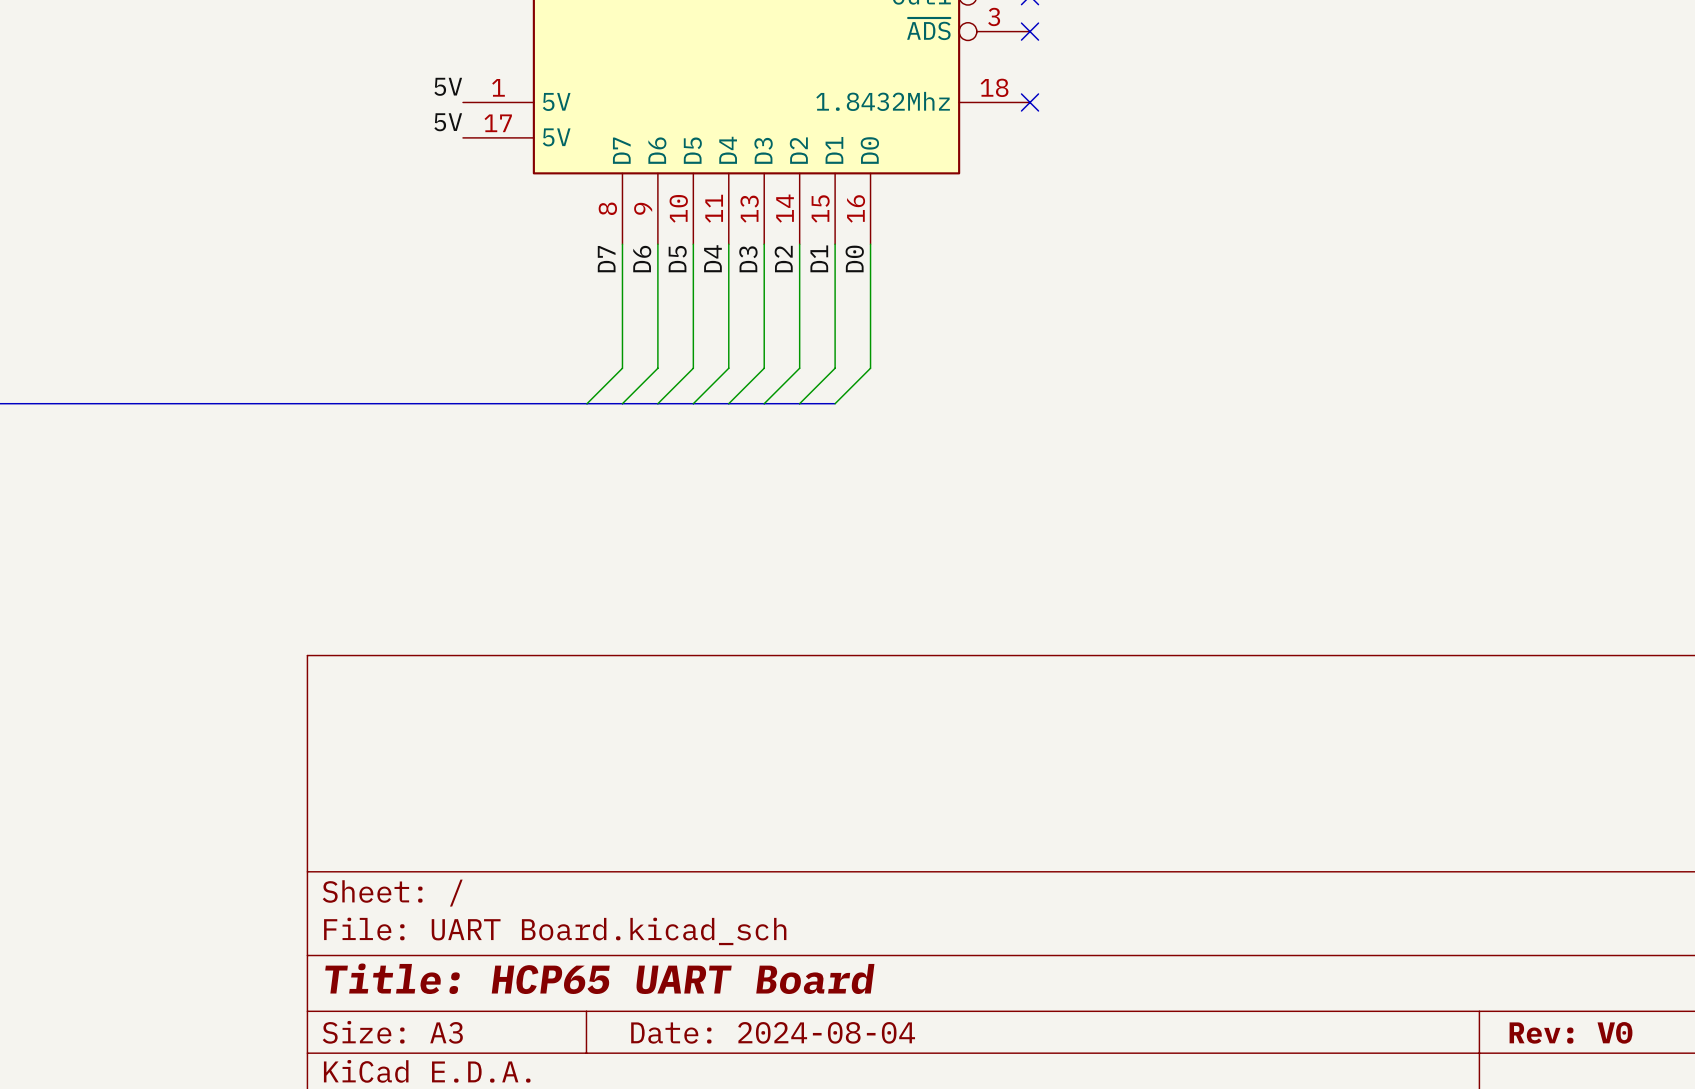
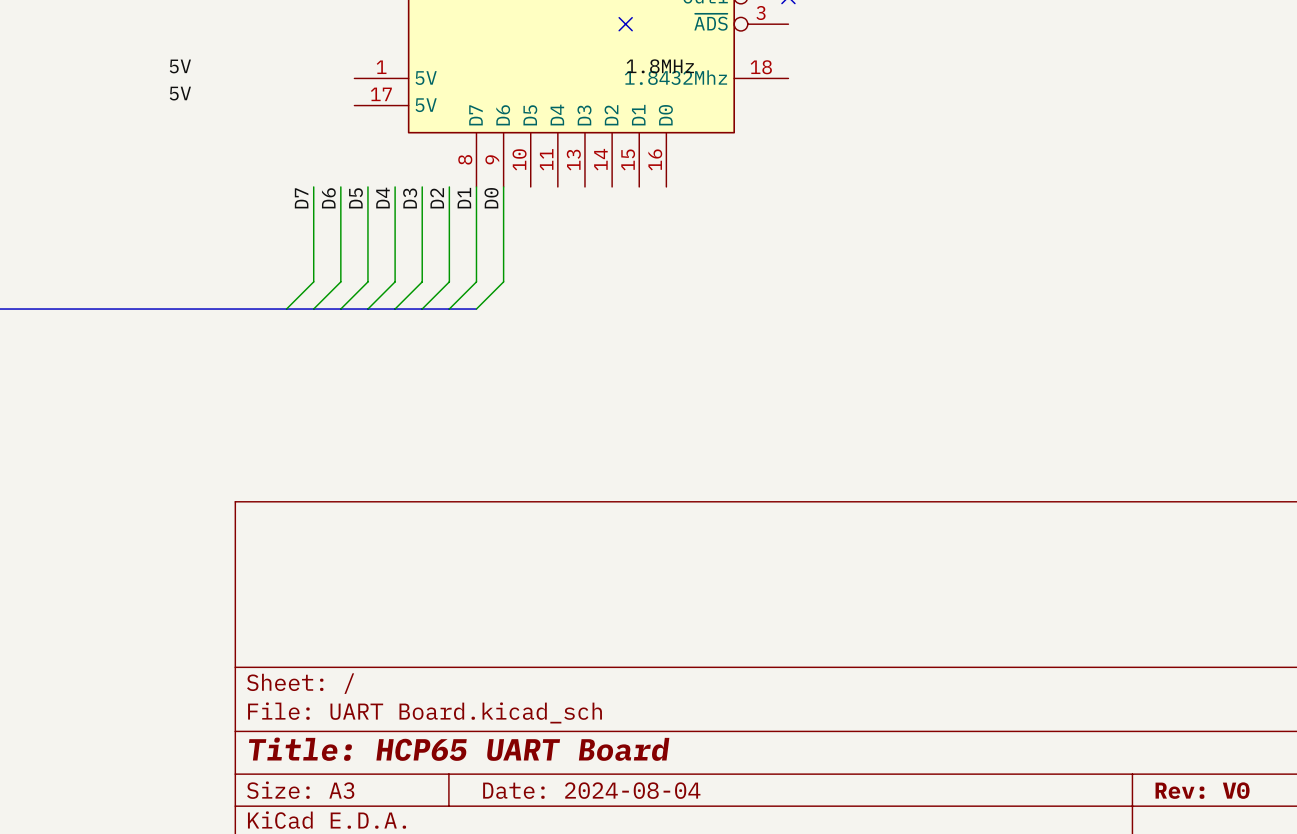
no-connect mark: none -> (625, 24)
no-connect mark: (1030, 31) -> none
label: none -> 5V (180, 66)
label: 5V (448, 86) -> none
label: none -> 1.8MHz (660, 66)
no-connect mark: (1030, 102) -> none
label: none -> 5V (180, 93)
label: 5V (448, 122) -> none
wire: none -> (313, 186) (313, 281) (286, 309)
wire: none -> (340, 186) (340, 281) (313, 309)
wire: (693, 244) (693, 368) (657, 403) -> (367, 186) (367, 281) (340, 309)
wire: (728, 244) (728, 368) (693, 403) -> (395, 186) (395, 281) (367, 309)
wire: (764, 244) (764, 368) (728, 403) -> (422, 186) (422, 281) (395, 309)
wire: (799, 244) (799, 368) (764, 403) -> (449, 186) (449, 281) (422, 309)
wire: (835, 244) (835, 368) (799, 403) -> none
wire: (870, 244) (870, 368) (835, 403) -> none
label position: D4 (712, 258) -> D4 (382, 198)
label: D1 (819, 258) -> none
label: D0 (854, 258) -> none
label: none -> D7 (301, 198)
label: none -> D6 (328, 198)
label: D7 (606, 259) -> D1 (464, 198)
label: D6 (642, 259) -> D0 (491, 198)
label position: D5 (677, 259) -> D5 (355, 198)
label position: D3 (748, 259) -> D3 (410, 198)
label position: D2 (783, 259) -> D2 (437, 198)
bus: (622, 403) (835, 403) -> none

